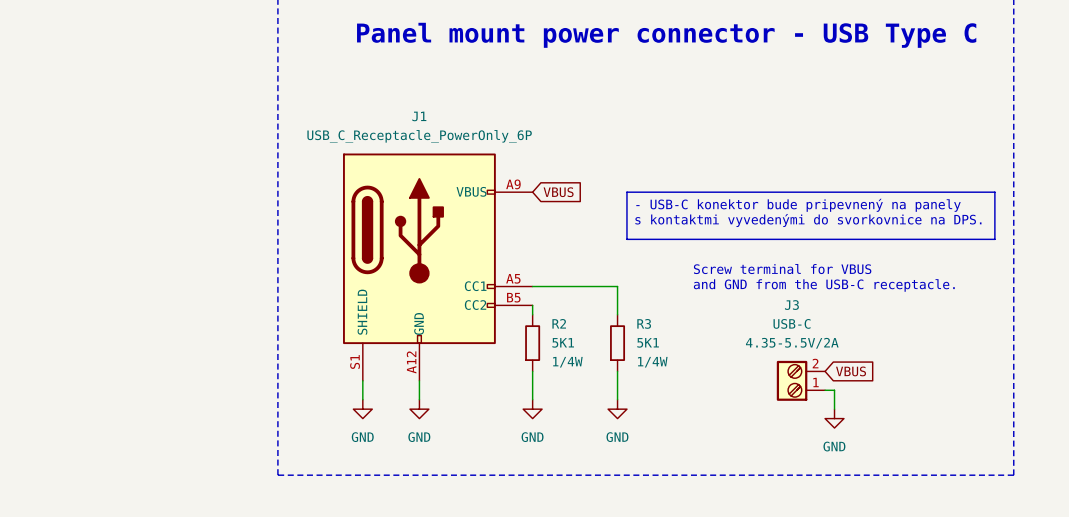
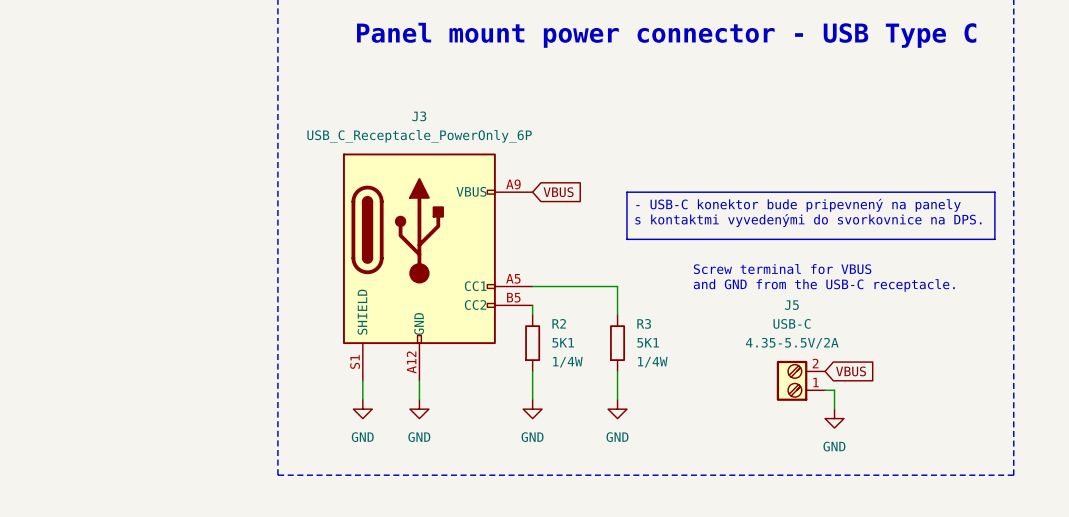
J1 name: J1 (419, 116) -> J3 (419, 116)
J3 name: J3 (791, 305) -> J5 (791, 305)

